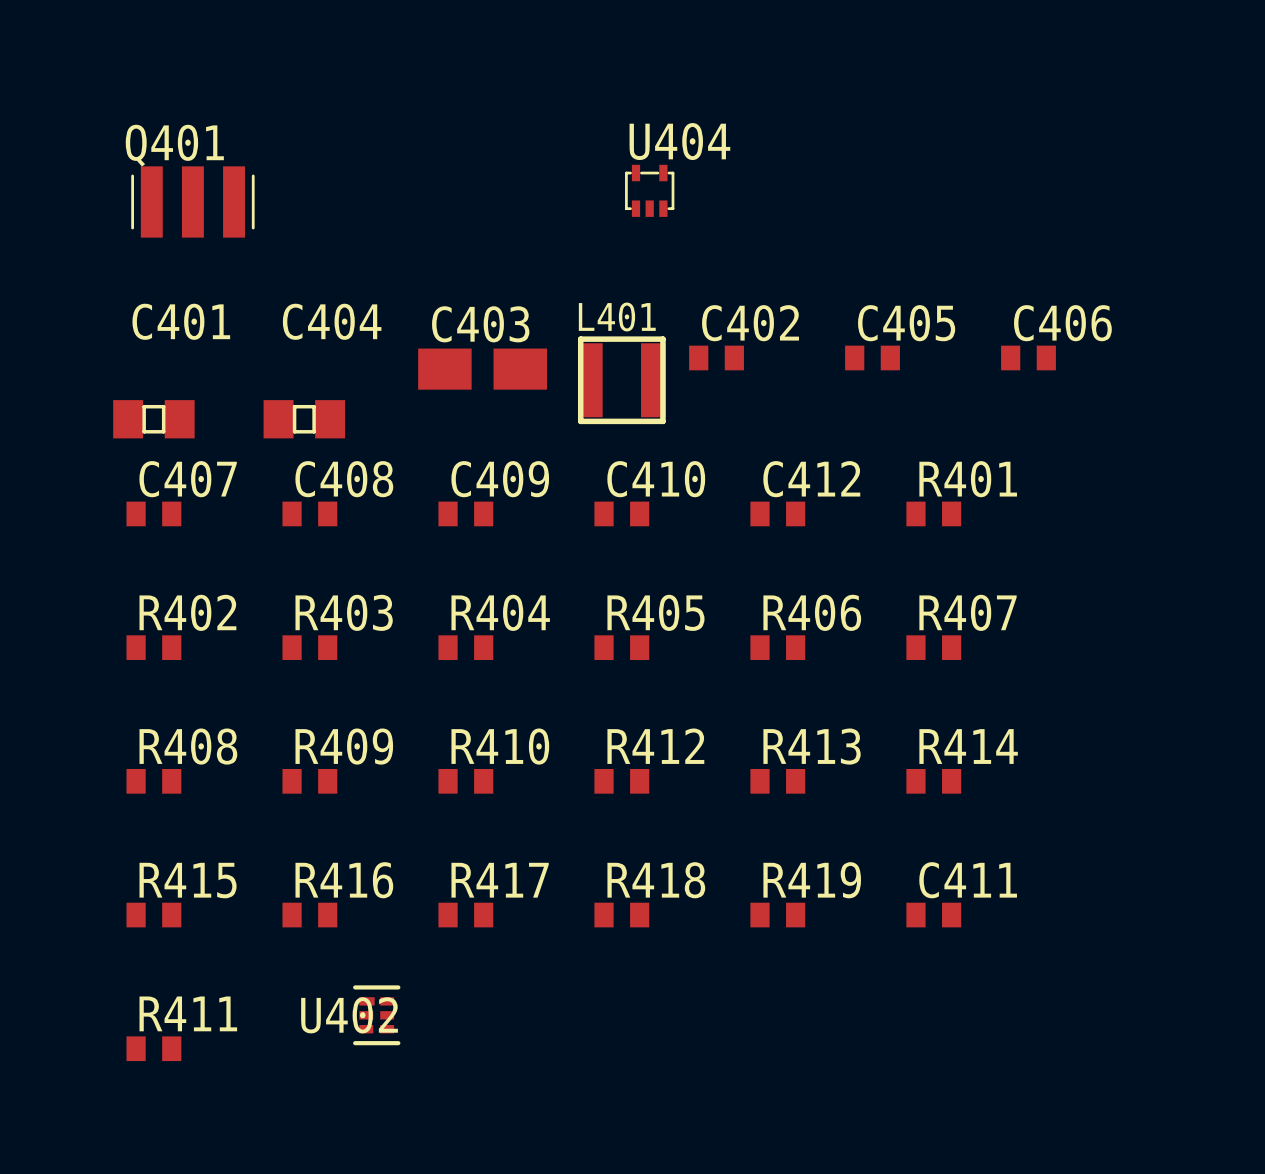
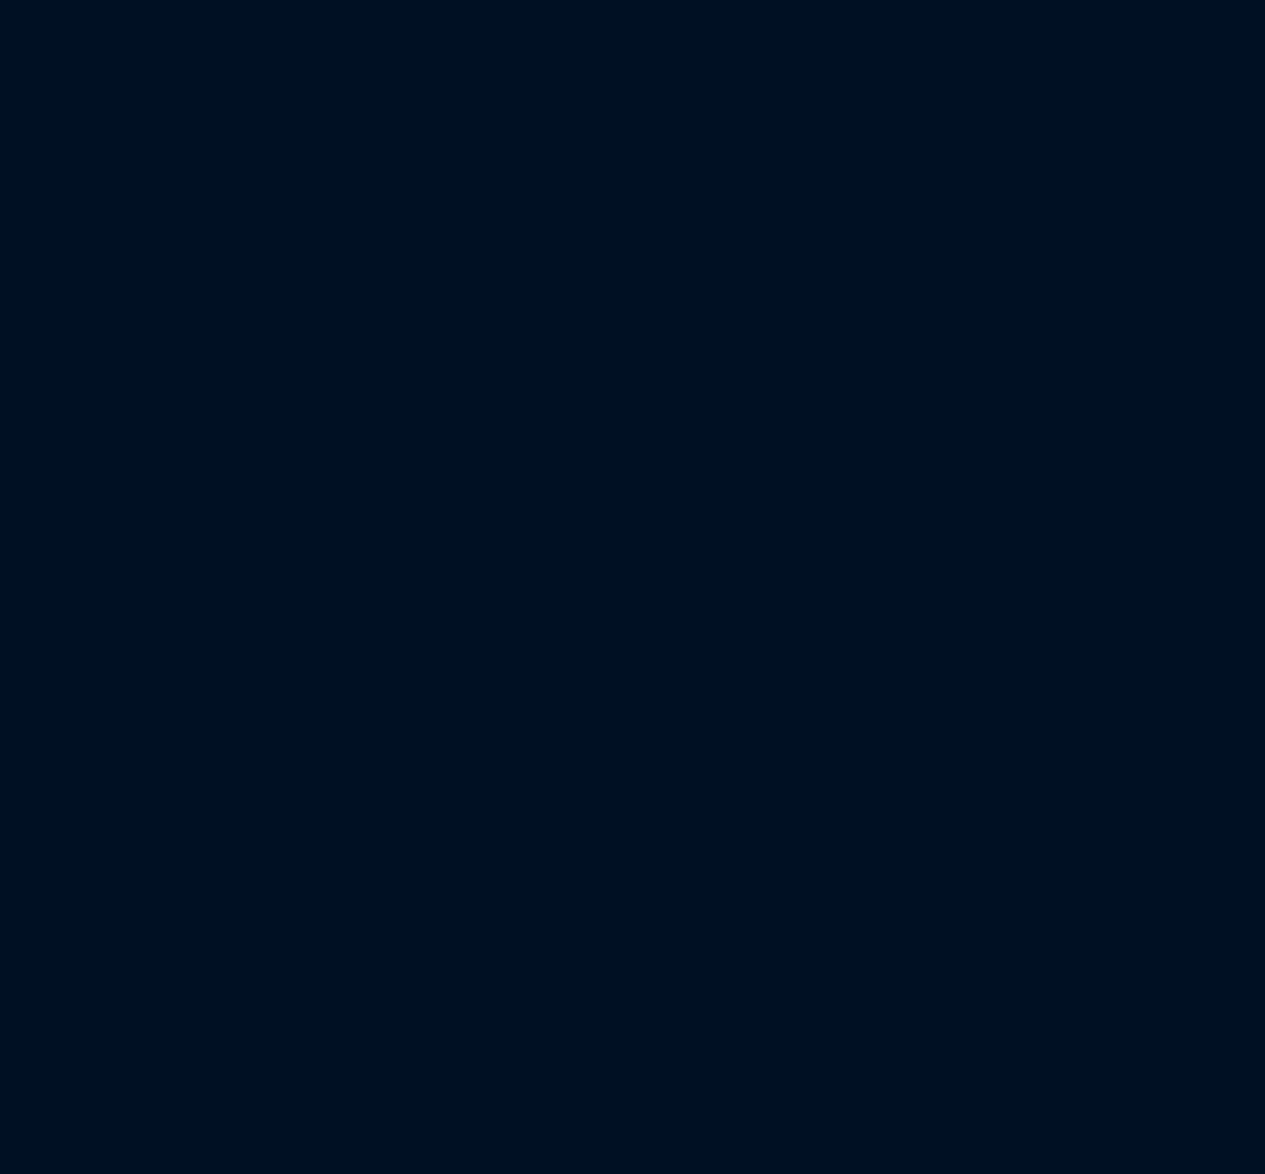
U404: (649, 190) -> none
Q401: (192, 201) -> none
C402: (716, 357) -> none
C405: (872, 357) -> none
C406: (1028, 357) -> none
C403: (482, 369) -> none
L401: (621, 380) -> none
C401: (153, 419) -> none
C404: (304, 419) -> none
C407: (153, 513) -> none
C408: (309, 513) -> none
C409: (465, 513) -> none
C410: (621, 513) -> none
C412: (777, 513) -> none
R401: (933, 513) -> none
R402: (153, 647) -> none
R403: (309, 647) -> none
R404: (465, 647) -> none
R405: (621, 647) -> none
R406: (777, 647) -> none
R407: (933, 647) -> none
R408: (153, 781) -> none
R409: (309, 781) -> none
R410: (465, 781) -> none
R412: (621, 781) -> none
R413: (777, 781) -> none
R414: (933, 781) -> none
R415: (153, 915) -> none
R416: (309, 915) -> none
R417: (465, 915) -> none
R418: (621, 915) -> none
R419: (777, 915) -> none
C411: (933, 915) -> none
U402: (376, 1015) -> none
R411: (153, 1048) -> none

